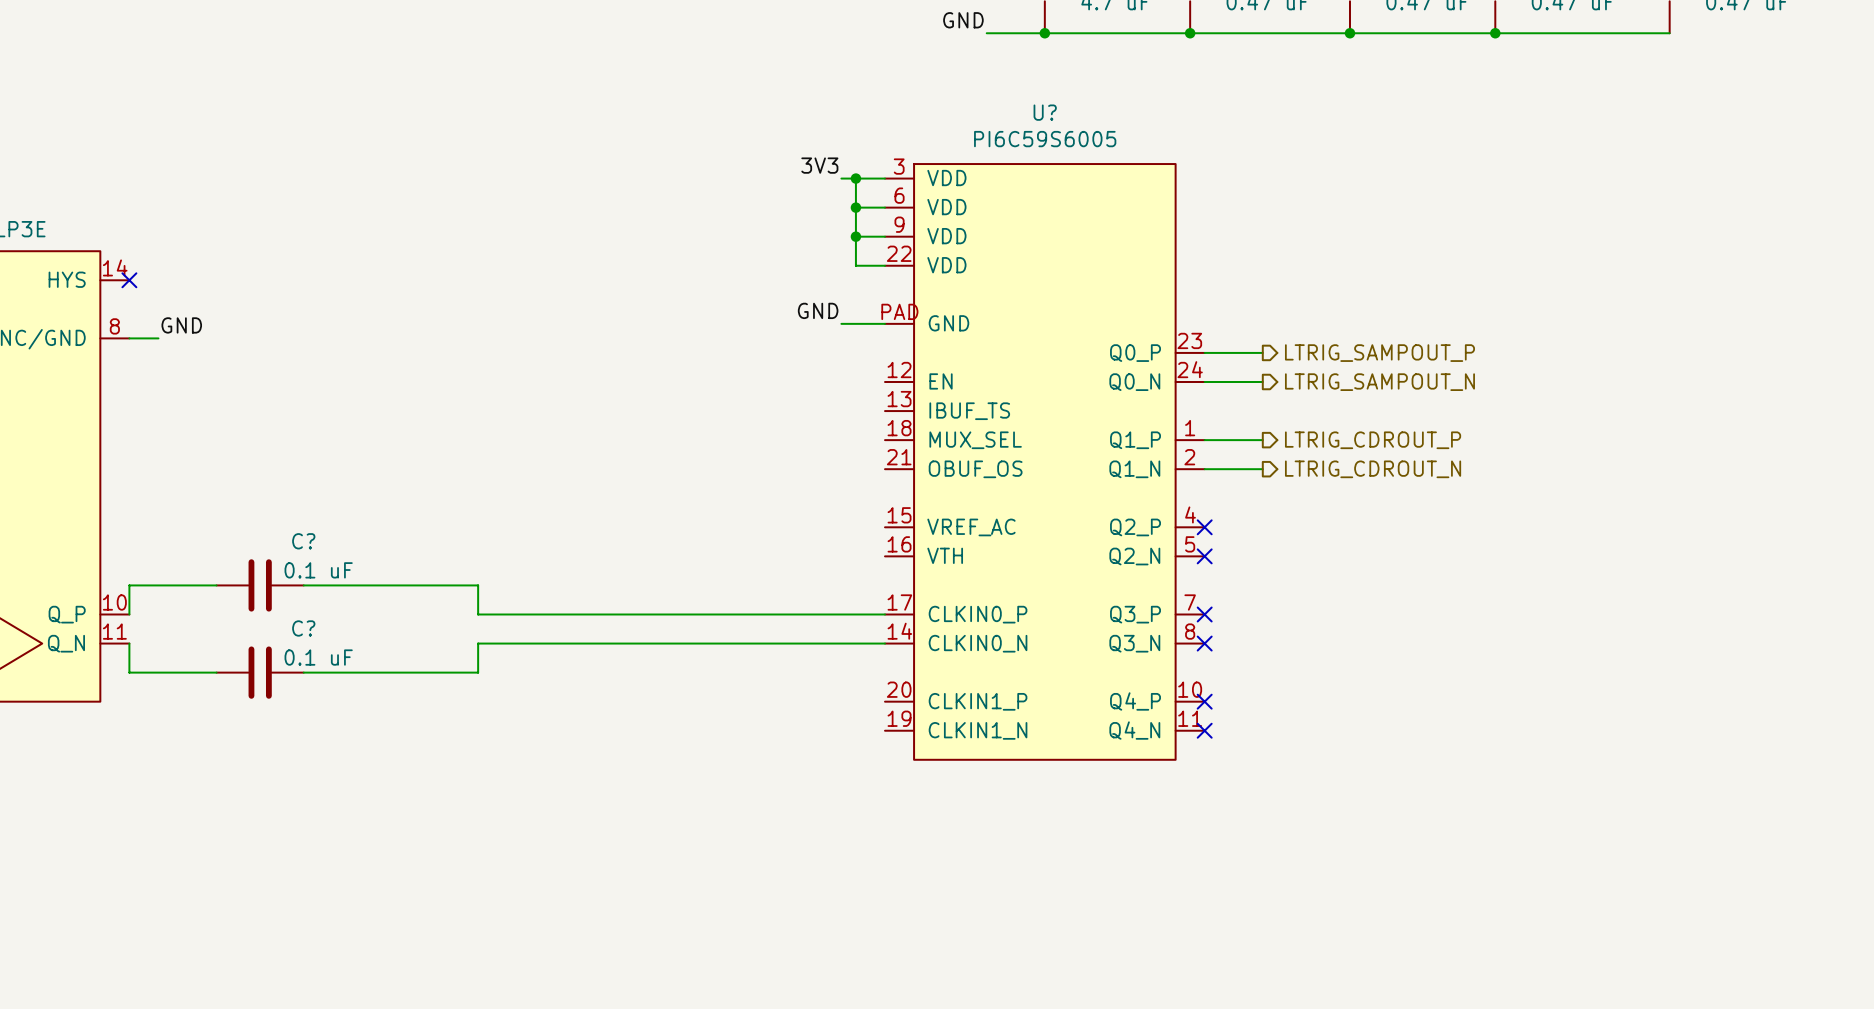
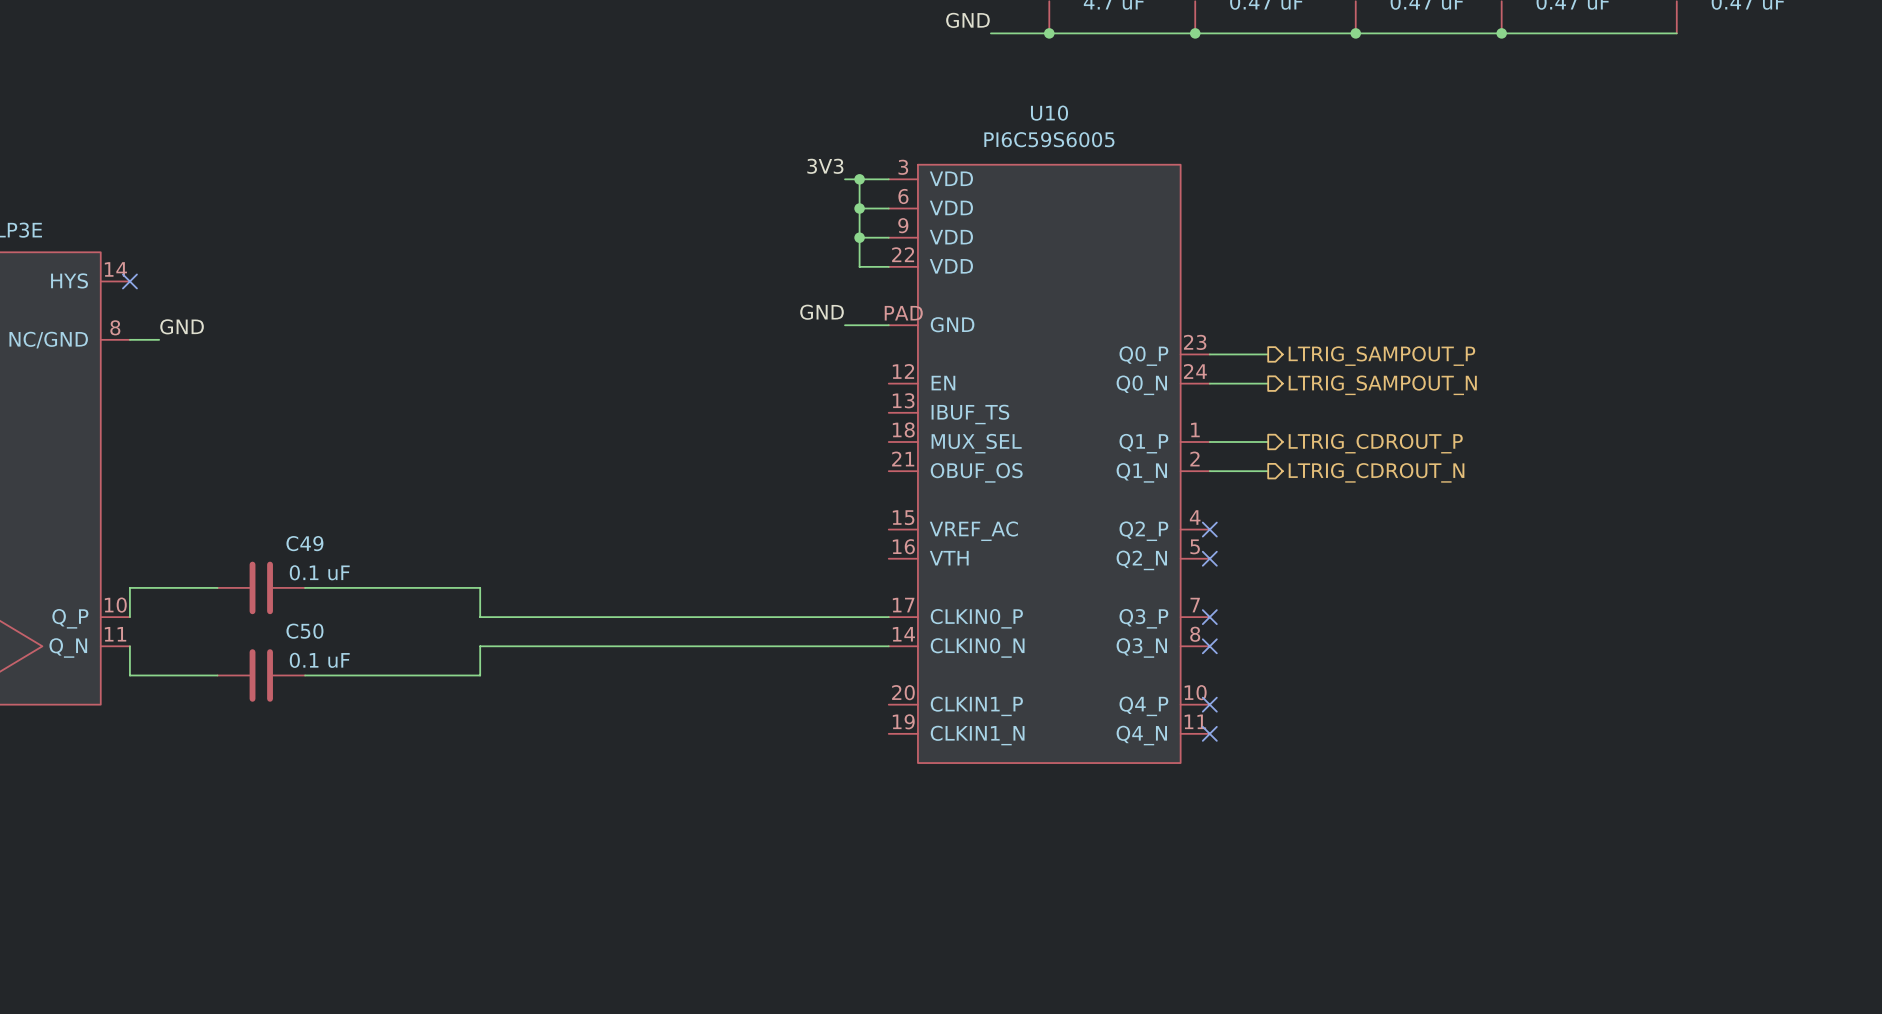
U? name: U? (1045, 112) -> U10 (1049, 113)
C? name: C? (303, 541) -> C49 (304, 543)
C? name: C? (303, 628) -> C50 (304, 631)

